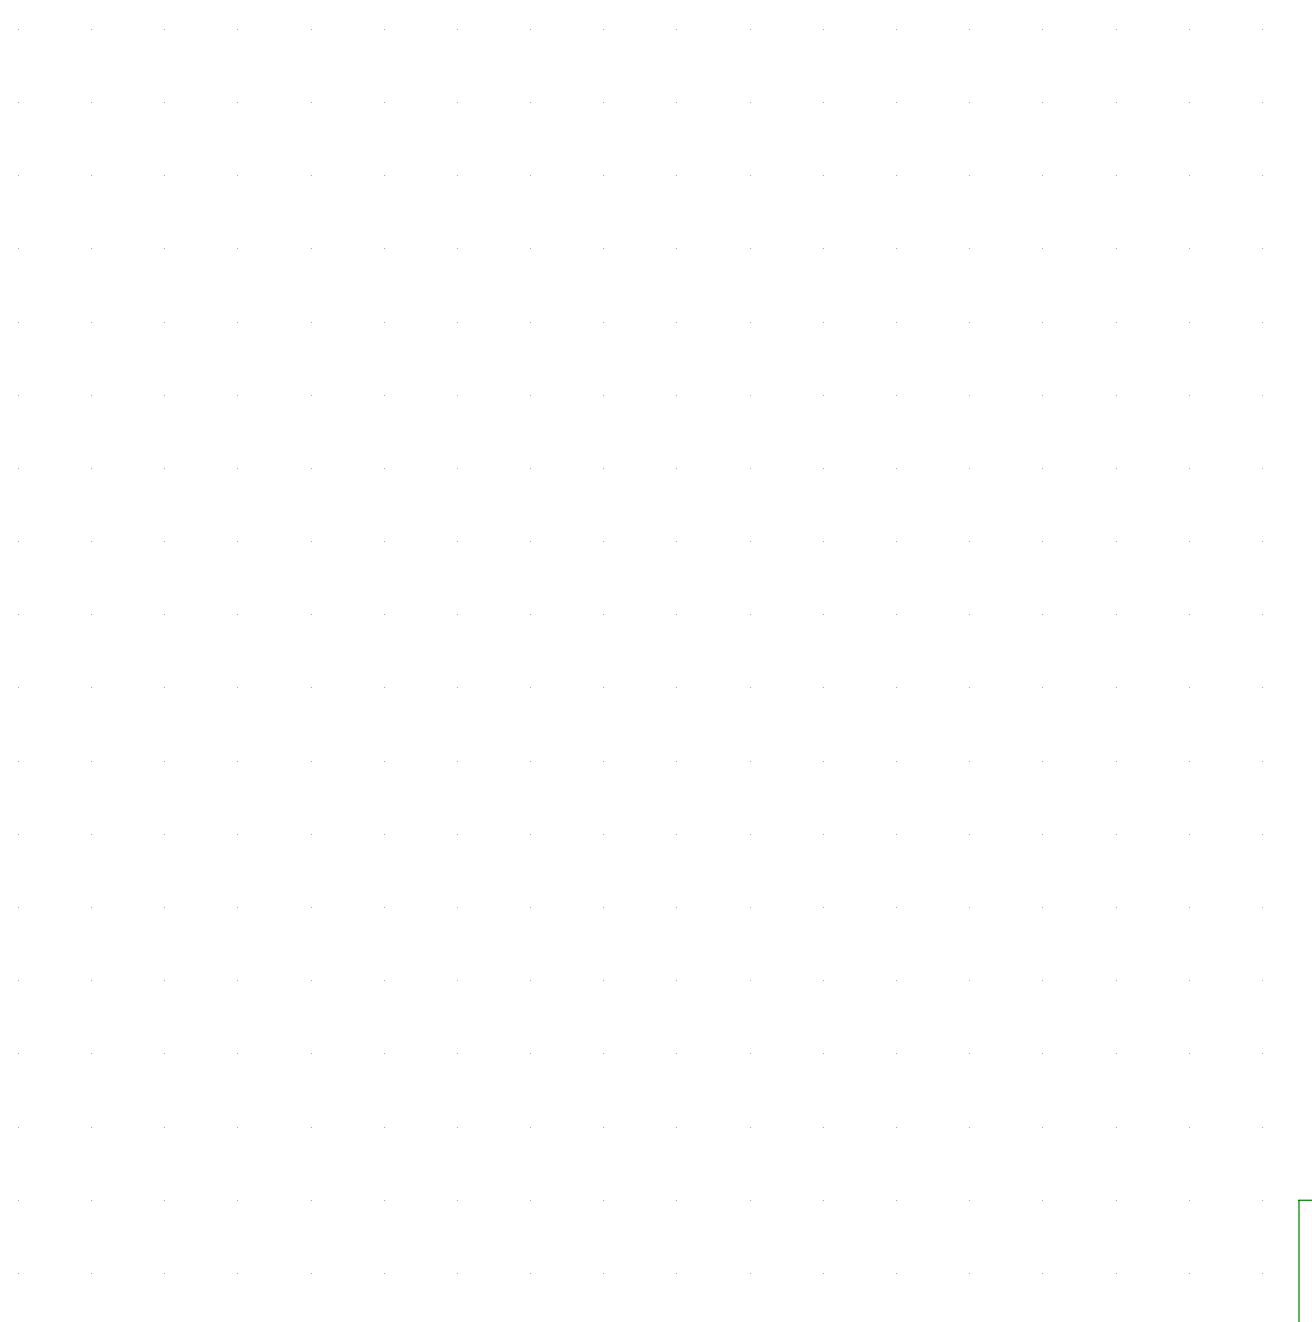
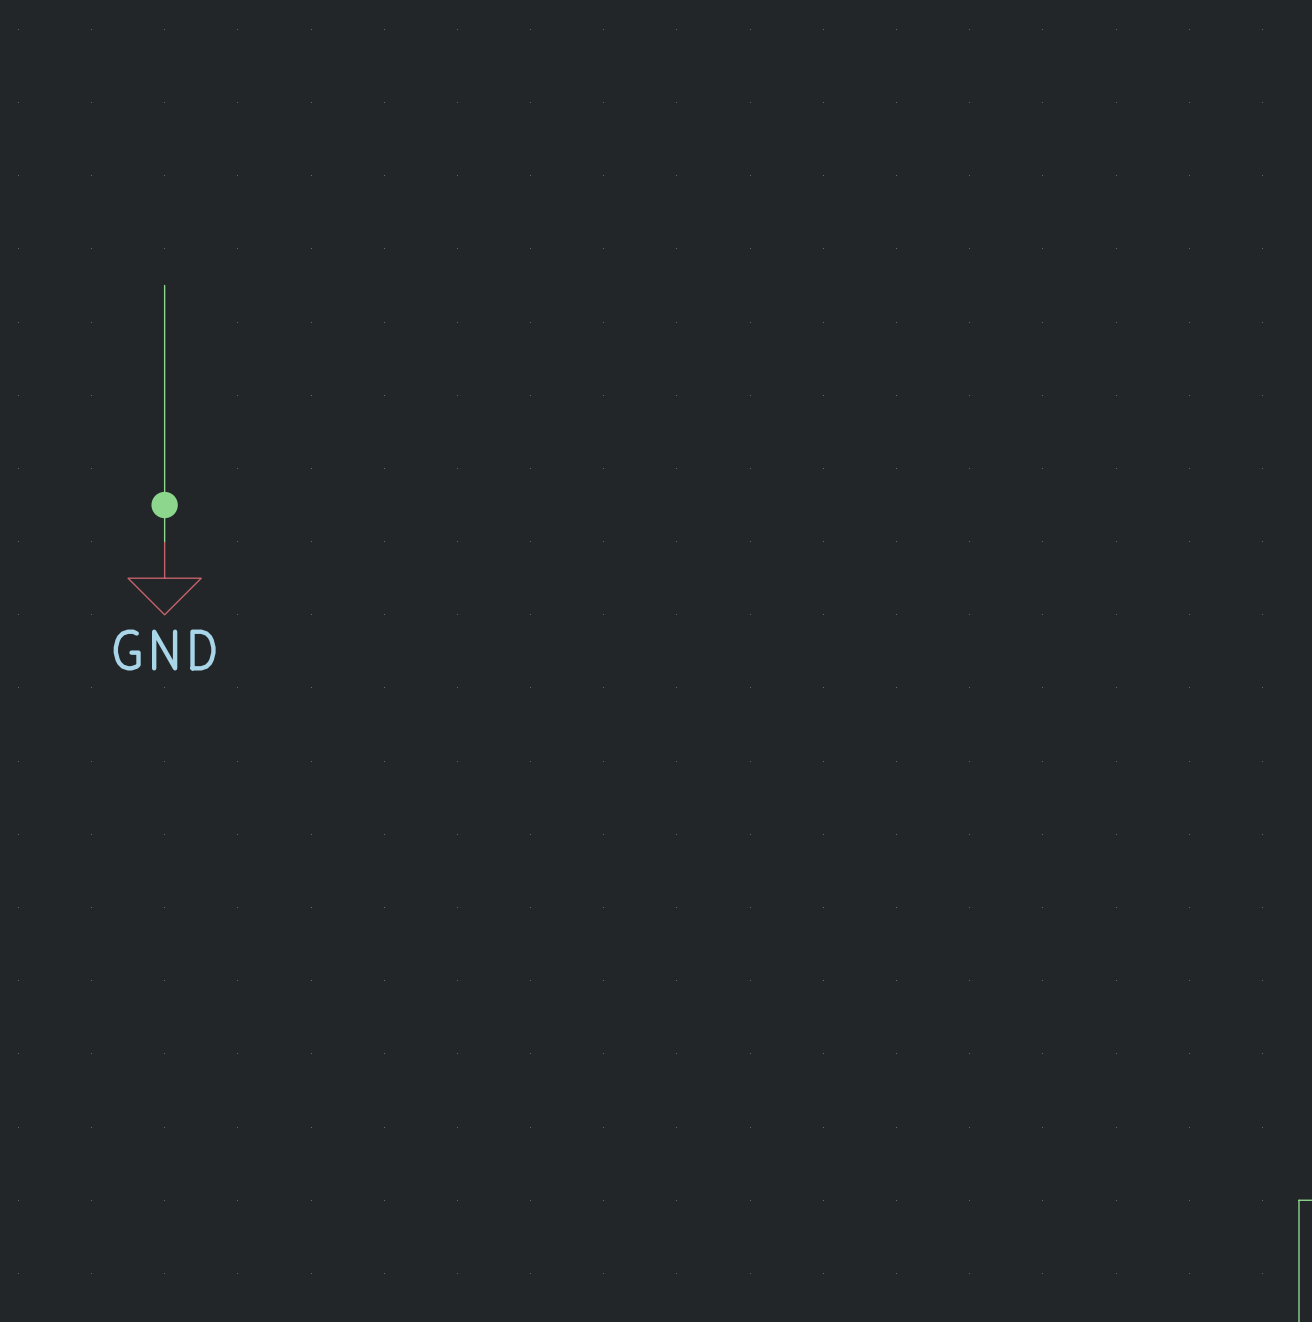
wire: none -> (164, 285) (164, 541)
junction: none -> (164, 505)
power symbol: none -> GND (164, 578)

